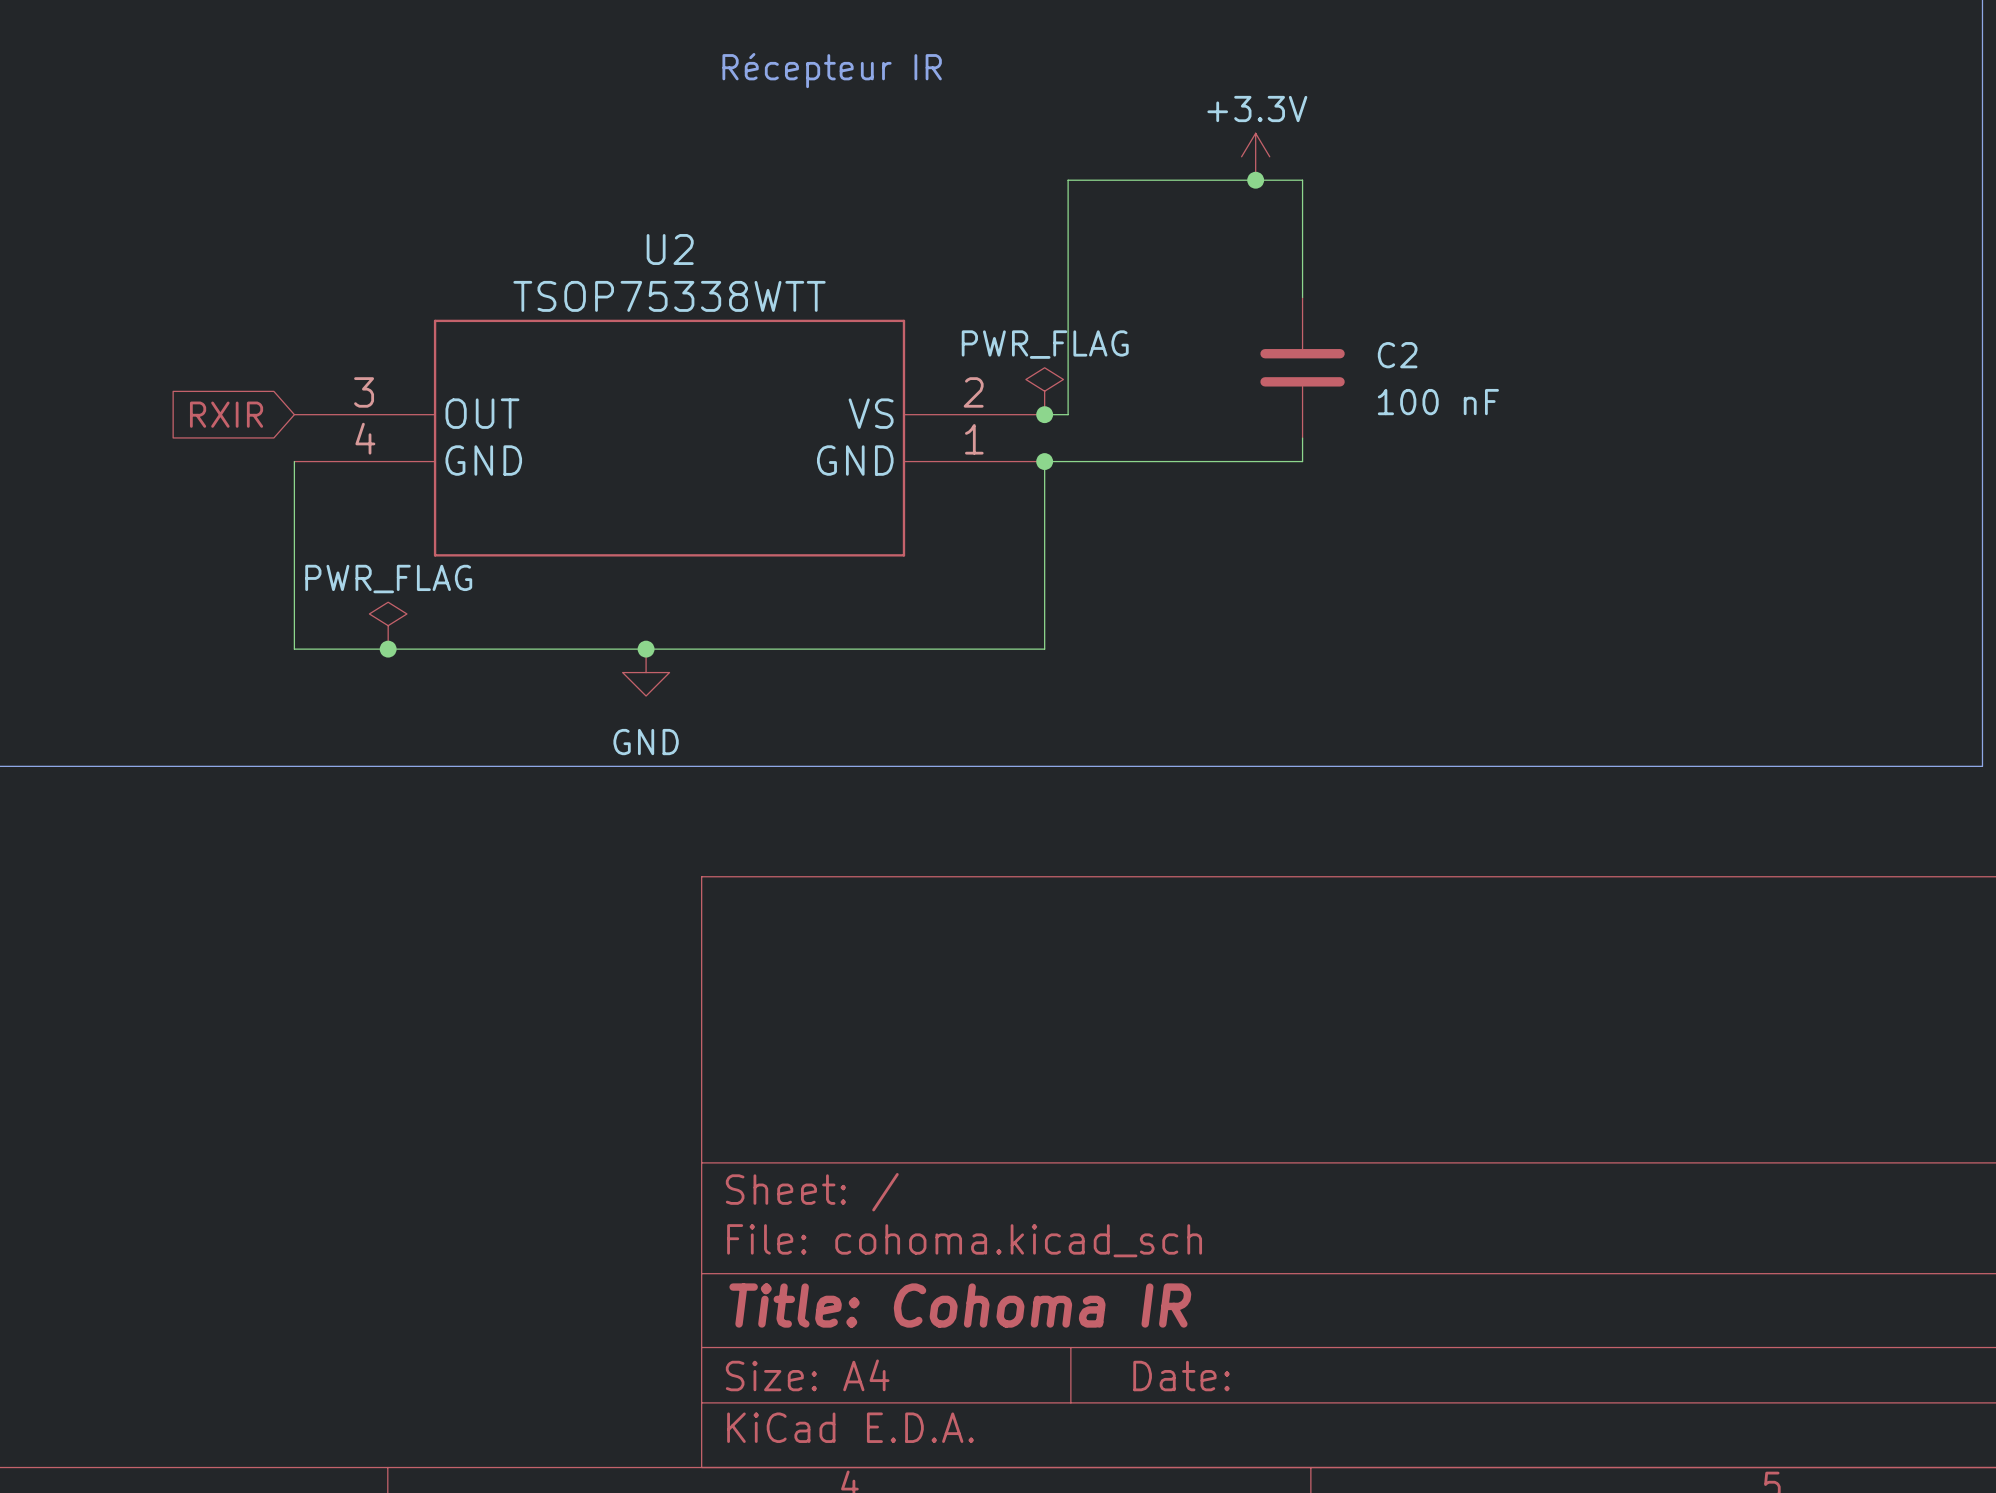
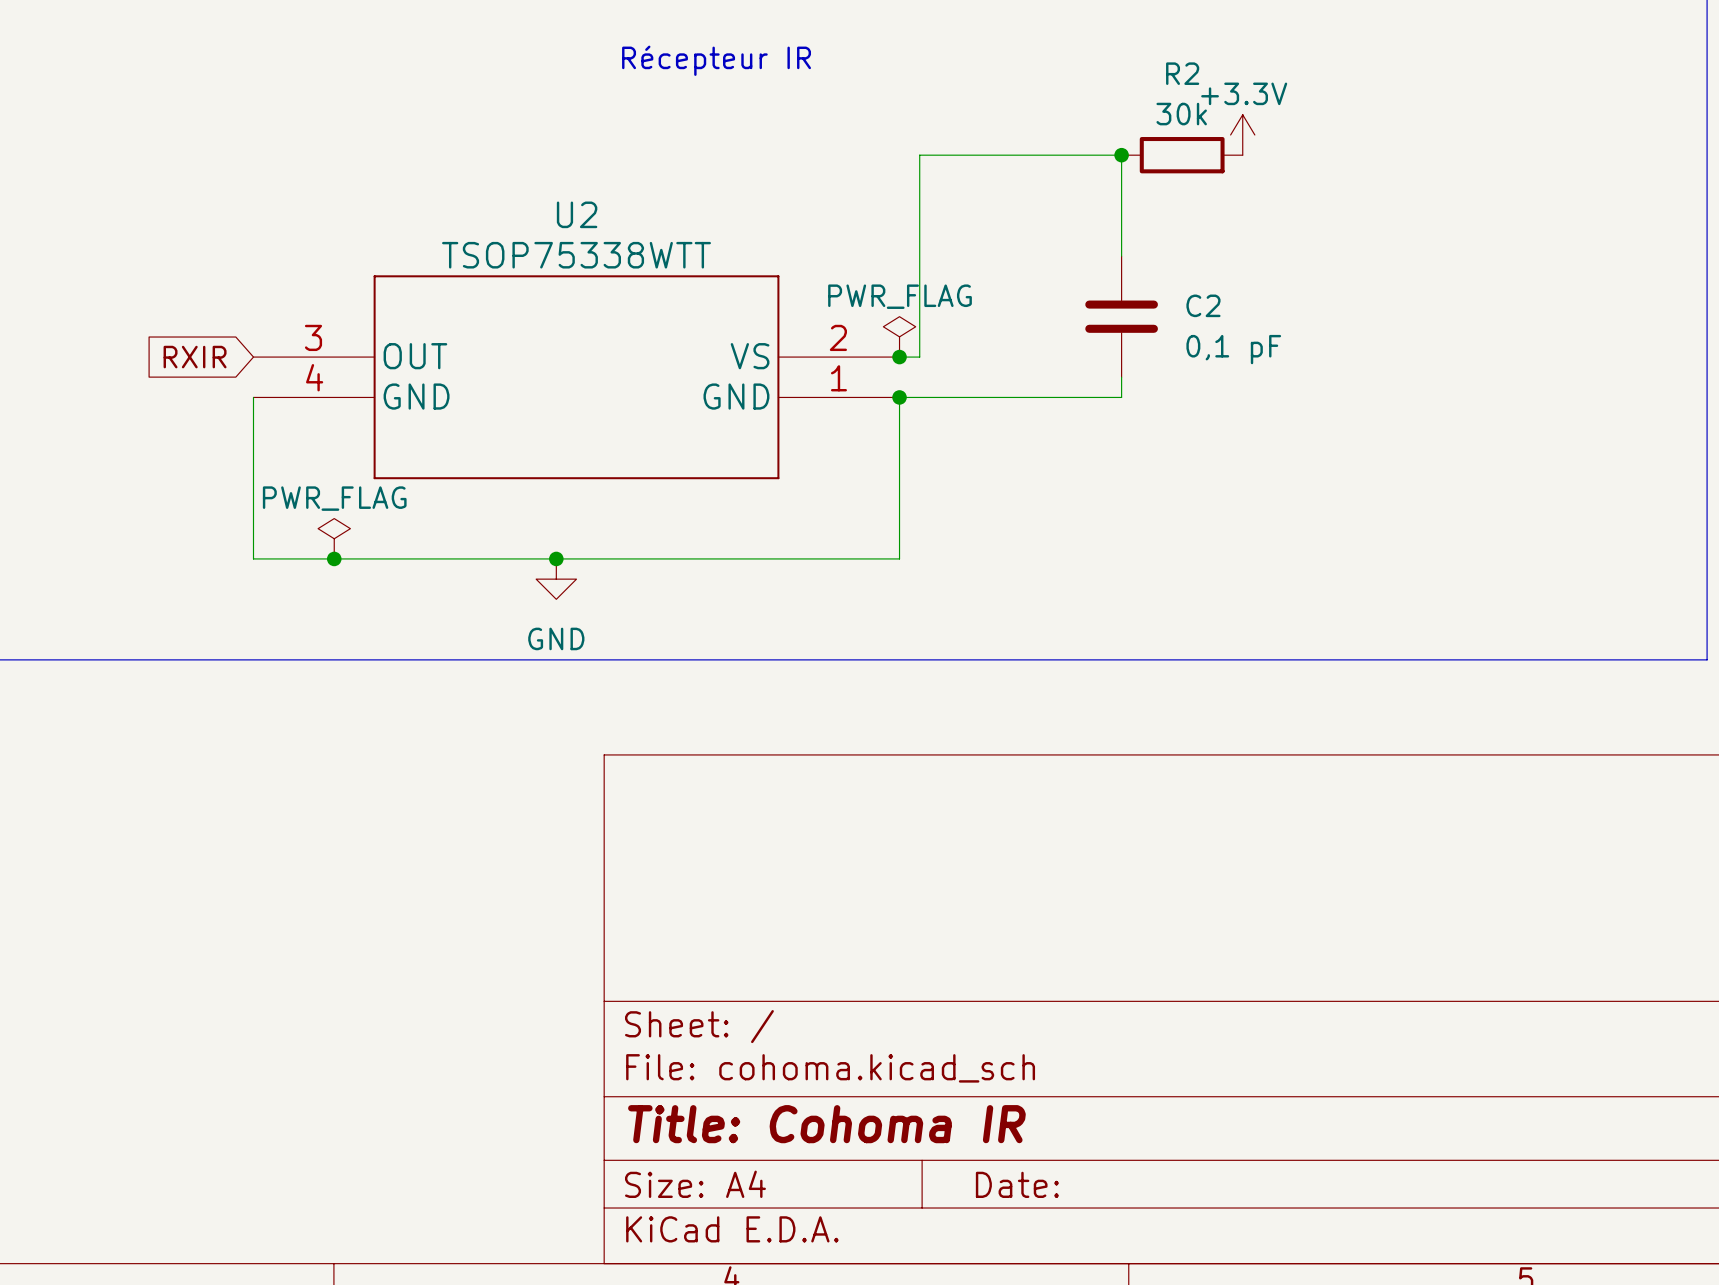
power symbol position: +3.3V (1255, 156) -> +3.3V (1242, 134)
junction position: (1255, 180) -> (1121, 155)
R2: none -> 30k (1182, 155)
C2 value: 100 nF (1438, 402) -> 0,1 pF (1233, 349)

